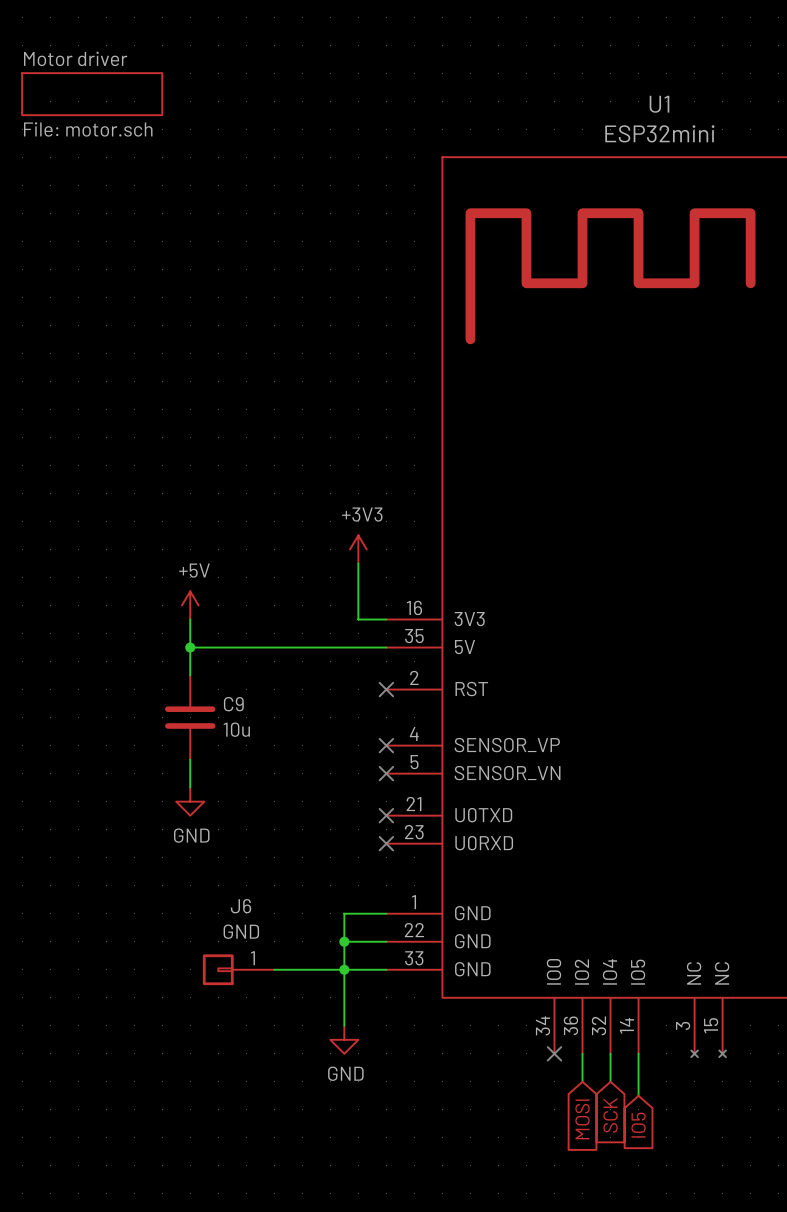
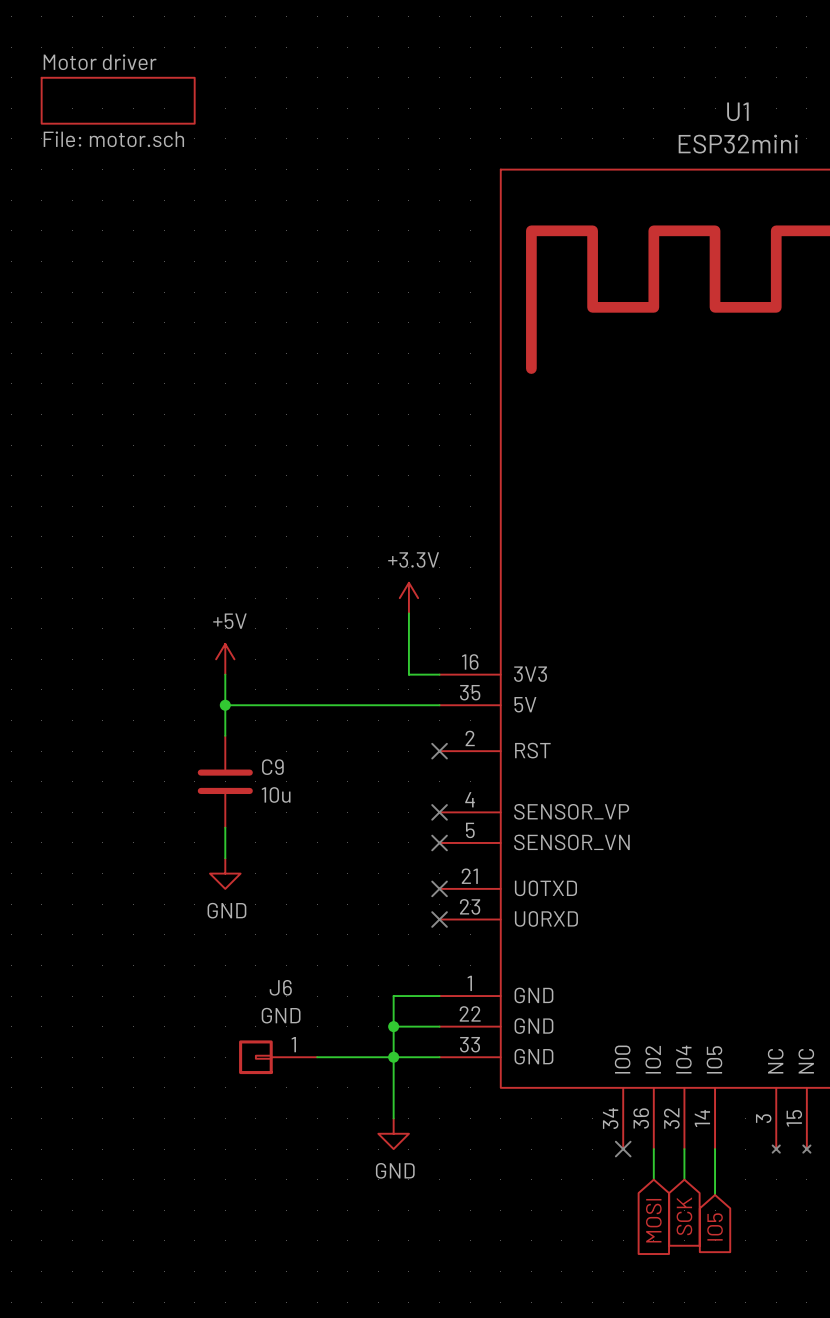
power symbol: +3V3 (358, 549) -> +3.3V (408, 598)

